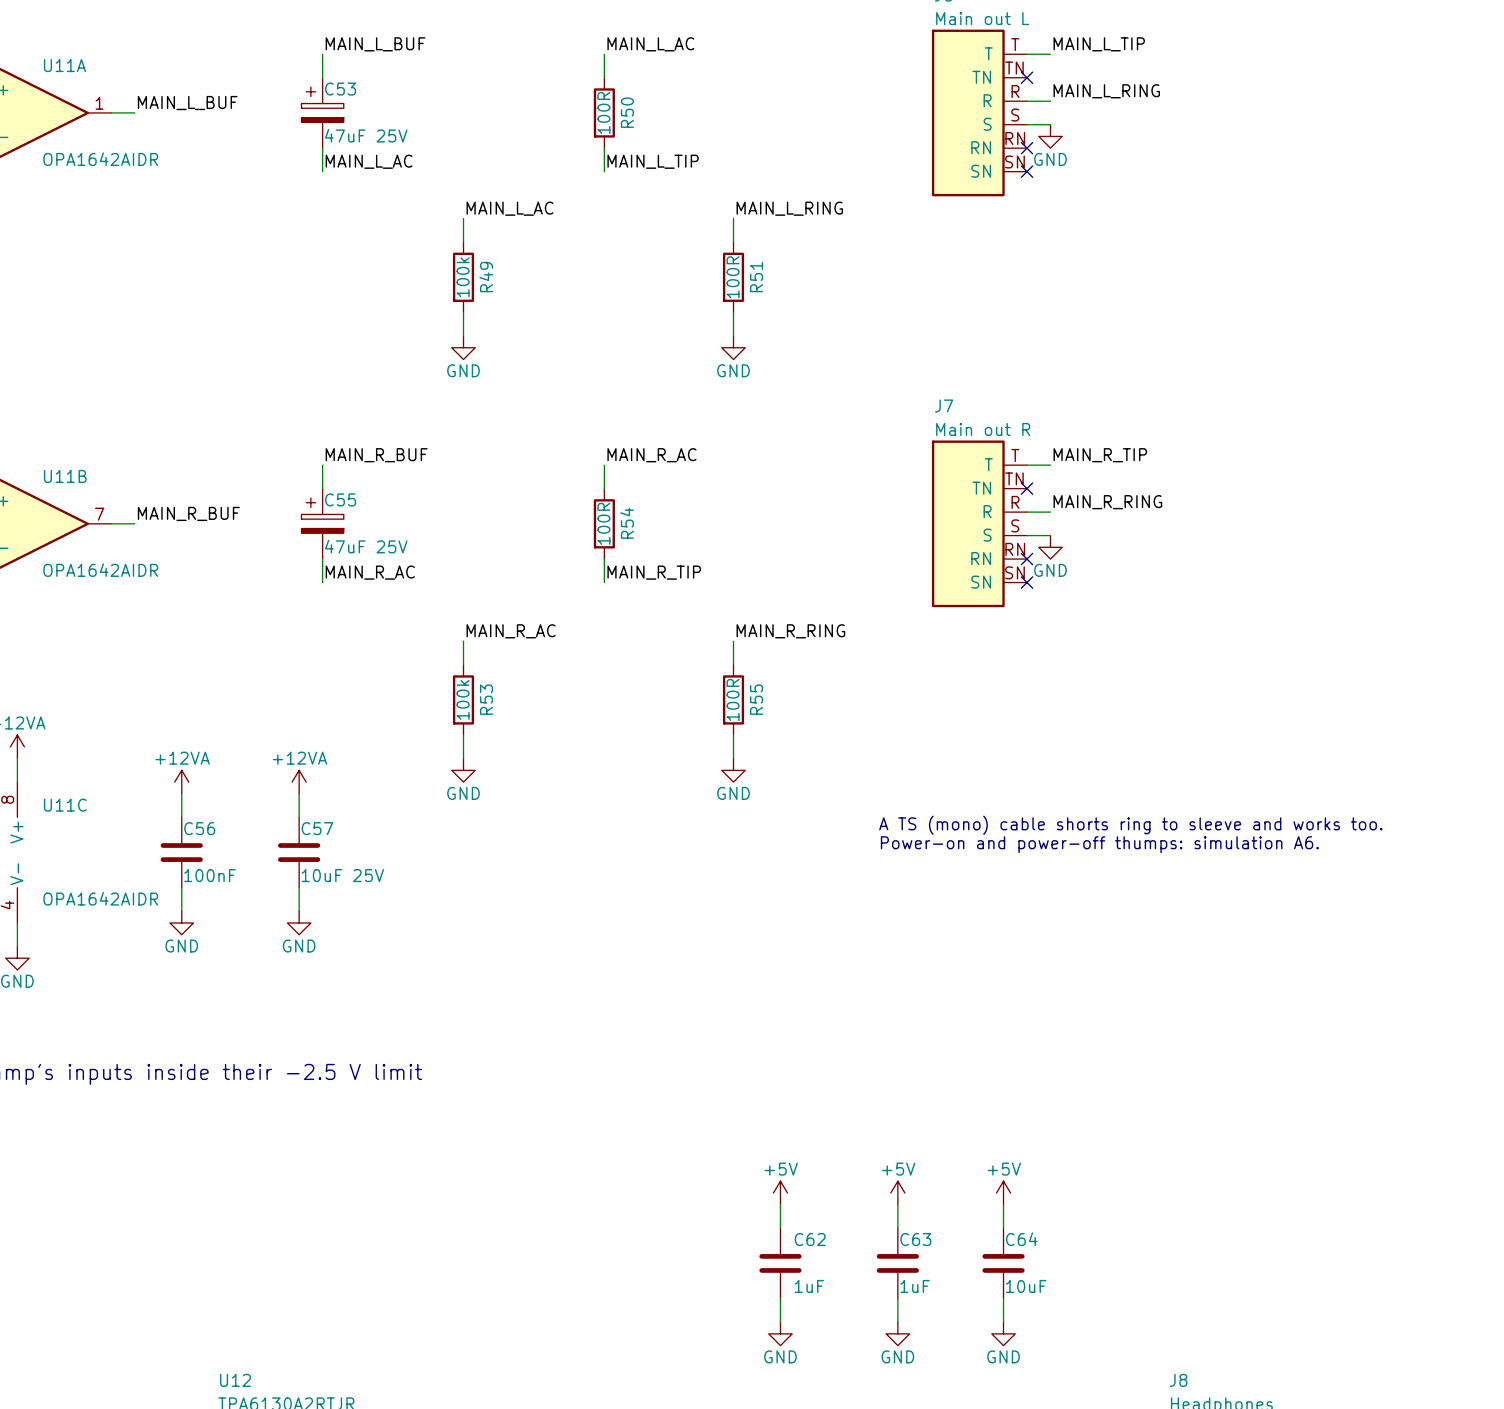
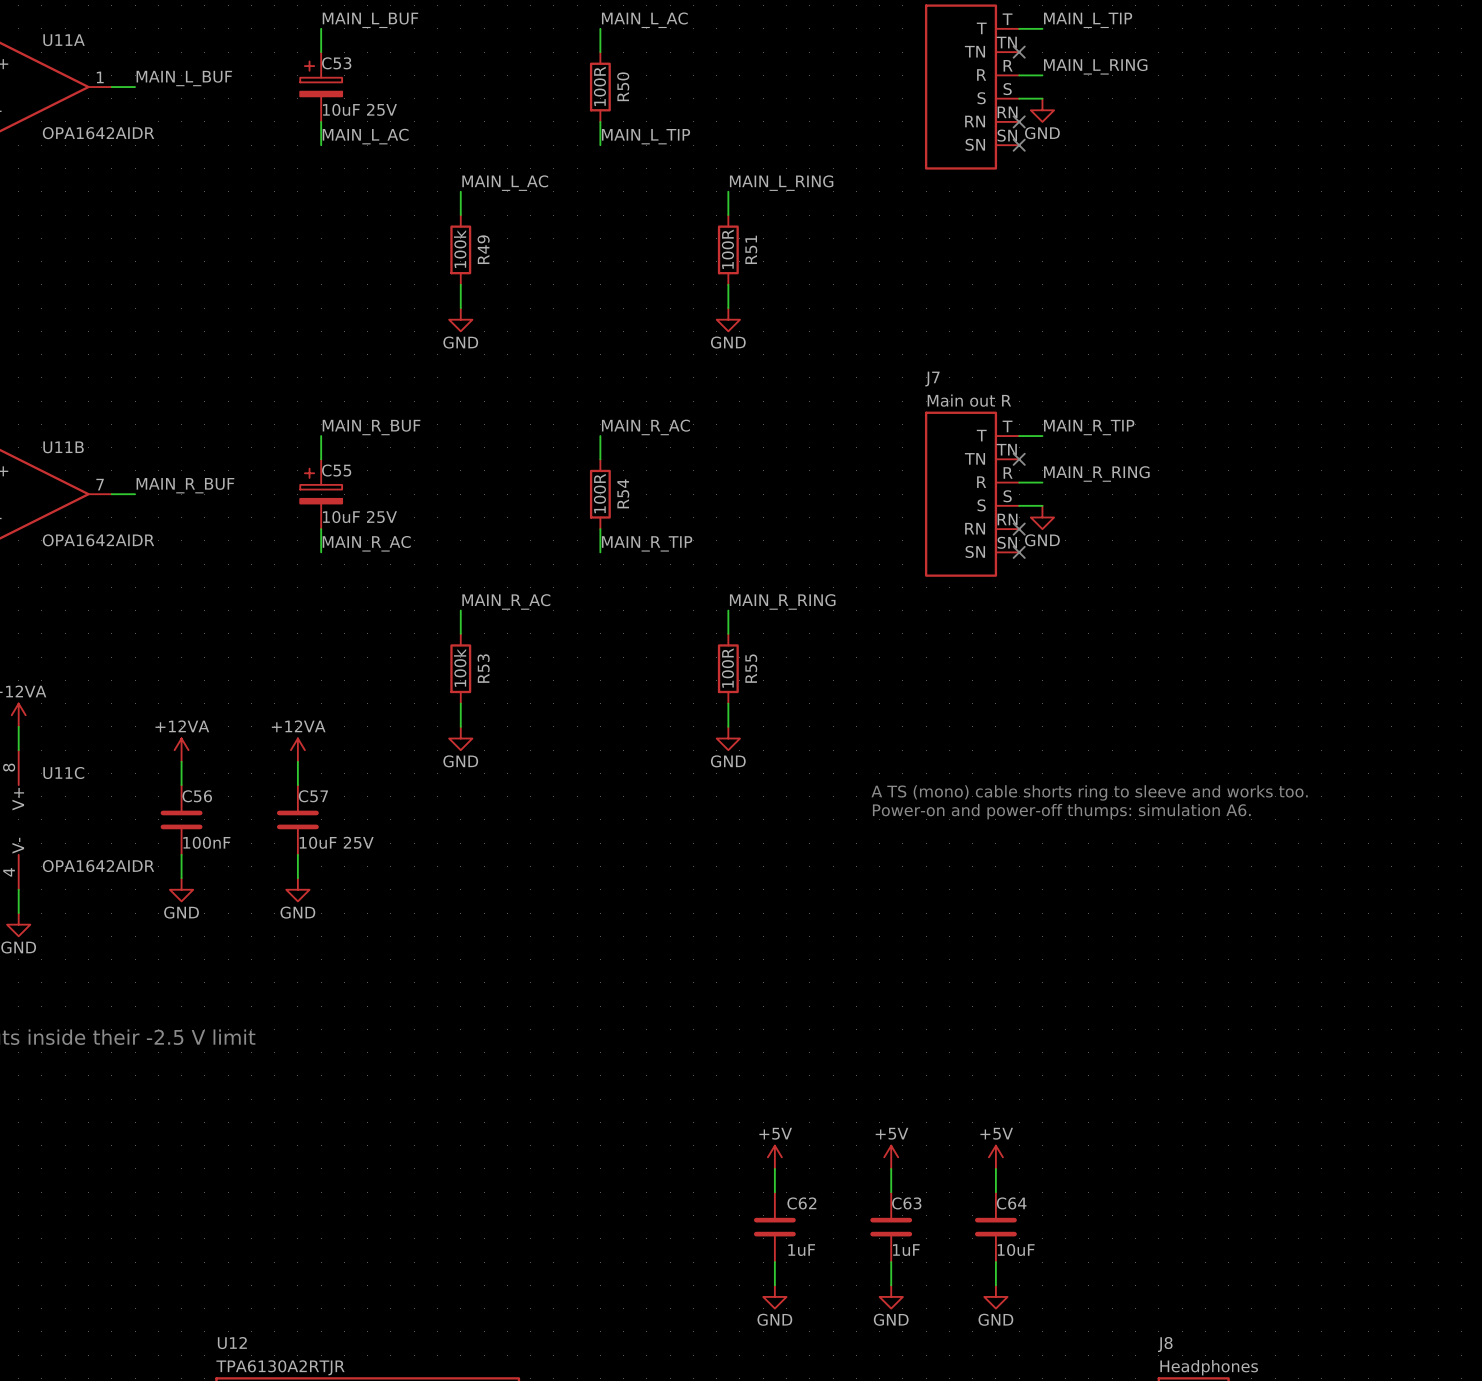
C53 value: 47uF 25V (366, 135) -> 10uF 25V (359, 109)
C55 value: 47uF 25V (366, 546) -> 10uF 25V (359, 517)

